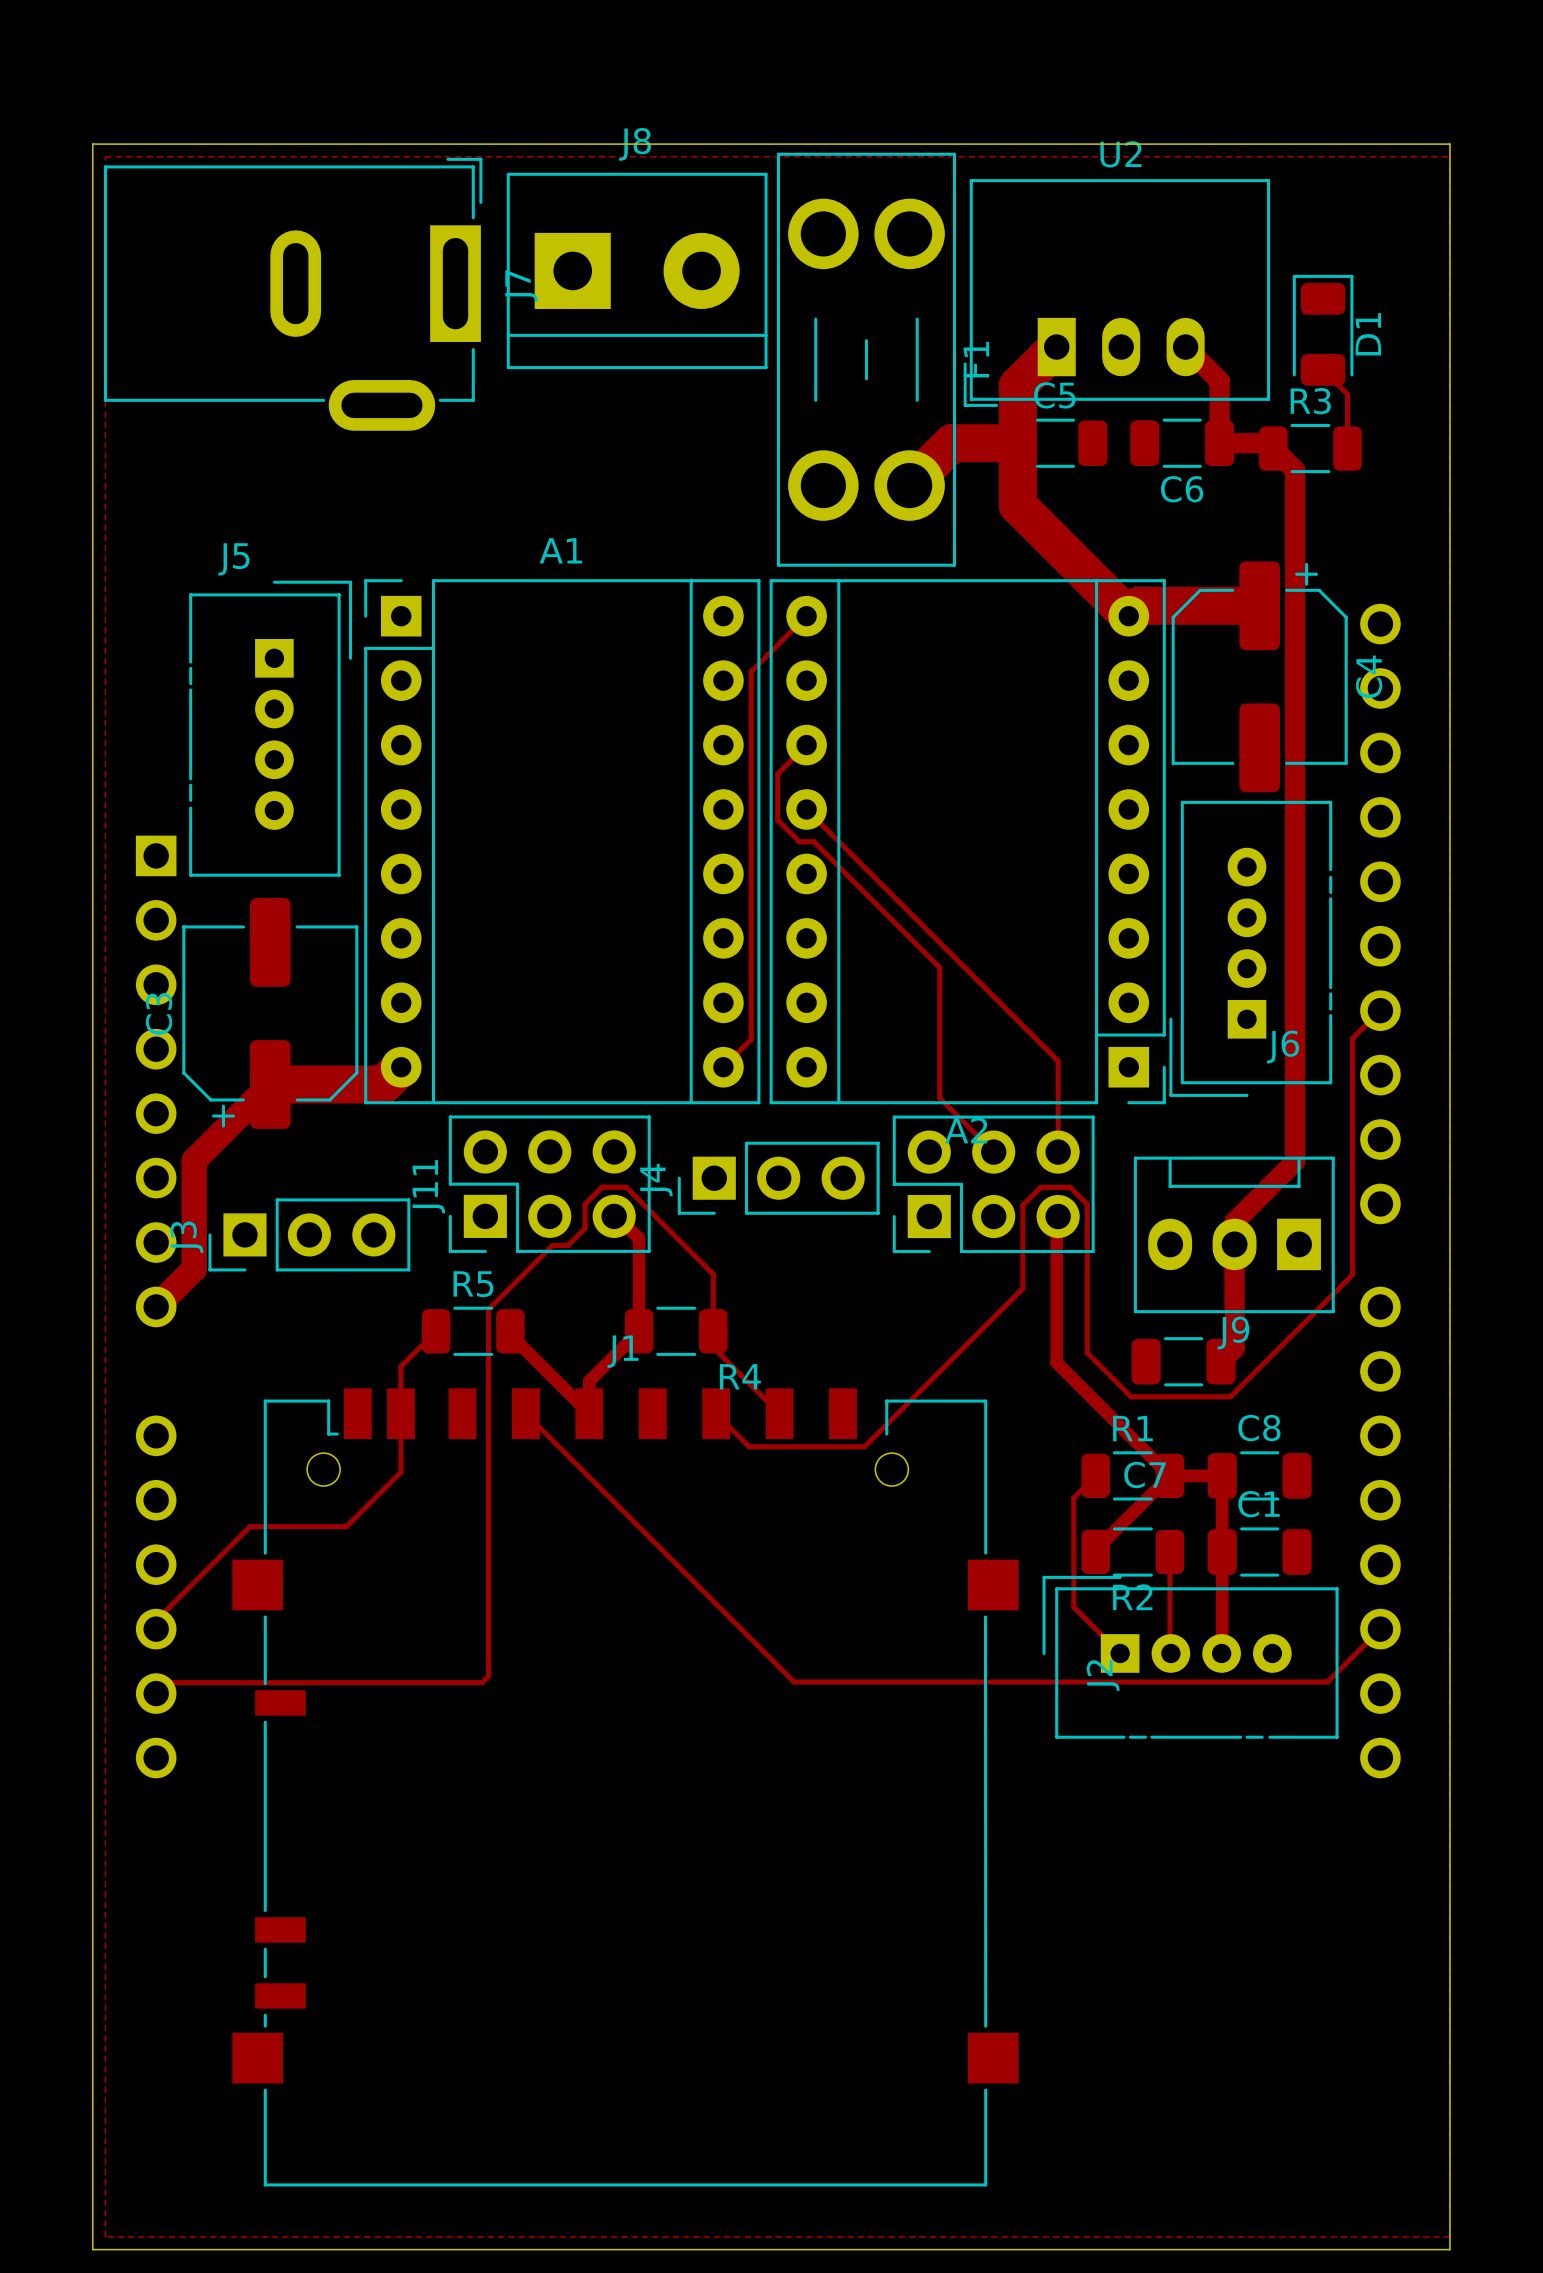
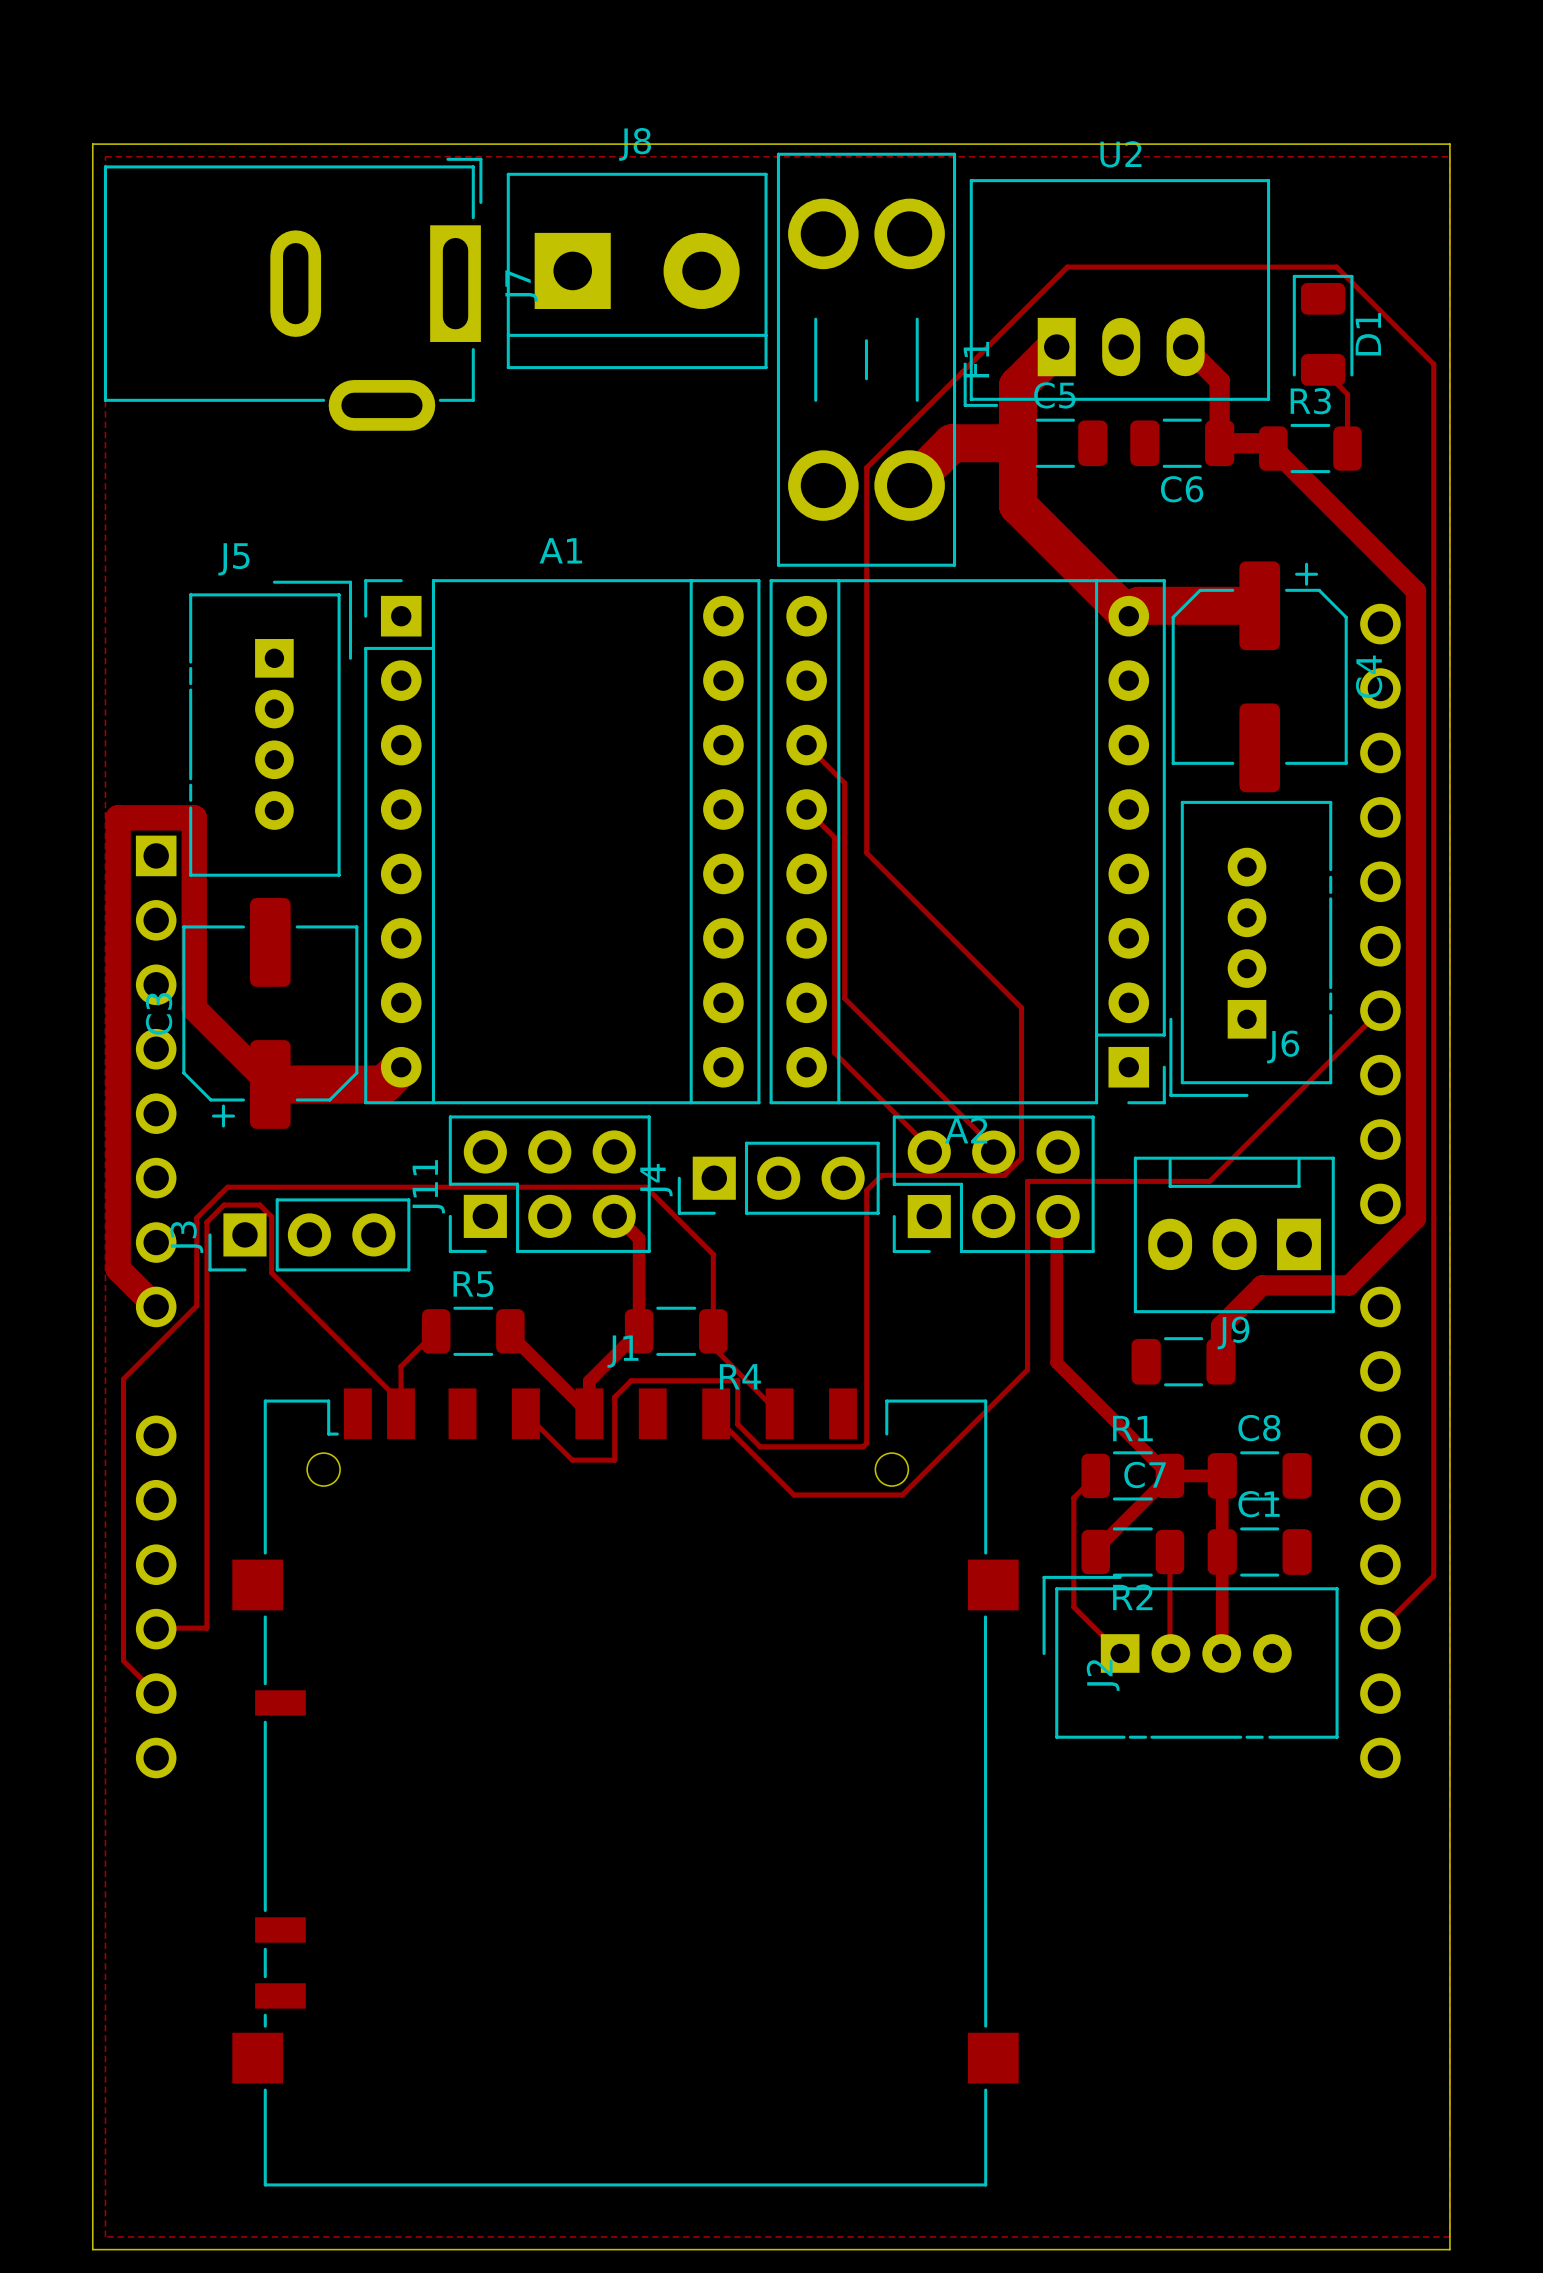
track: (1295, 470) (1295, 1161) (1234, 1221) (1234, 1244) -> (1295, 470) (1415, 591) (1415, 1218) (1349, 1285) (1261, 1285) (1221, 1326) (1221, 1361)
track: (806, 616) (751, 671) (751, 1039) (723, 1067) -> none
track: (806, 745) (777, 773) (777, 820) (799, 841) (813, 841) (939, 967) (939, 1098) (993, 1152) -> (806, 745) (844, 783) (844, 998) (992, 1146)
track: (834, 837) (1058, 1061) (1058, 1152) -> (834, 837) (834, 1052) (927, 1146)
track: (1352, 1038) (1352, 1274) (1230, 1396) (1131, 1396) (1087, 1353) (1087, 1204) (1070, 1187) (1040, 1187) (1022, 1205) (1022, 1288) (863, 1446) -> (1352, 1038) (1209, 1181) (1027, 1181) (1027, 1369) (902, 1494) (793, 1494) (716, 1417) (716, 1413)
track: (270, 1084) (194, 1160) (194, 1268) (156, 1306) -> (270, 1084) (194, 1008) (194, 817) (118, 817) (118, 1268) (156, 1306)
track: (602, 1187) (585, 1204) (585, 1228) (567, 1245) (552, 1245) (488, 1309) (488, 1676) (482, 1682) (167, 1682) (156, 1693) -> (602, 1187) (227, 1187) (196, 1218) (196, 1305) (123, 1379) (123, 1660) (156, 1693)
track: (626, 1187) (713, 1274) -> (626, 1187) (646, 1187) (713, 1254) (713, 1274)
track: (1234, 1258) (1234, 1348) (1221, 1361) -> none
track: (400, 1413) (400, 1472) (346, 1526) (250, 1526) (156, 1620) (156, 1629) -> (400, 1402) (271, 1272) (271, 1216) (259, 1205) (224, 1205) (206, 1222) (206, 1628) (156, 1629)
track: (716, 1413) (749, 1446) (760, 1446) -> (572, 1460) (614, 1460) (614, 1397) (631, 1380) (737, 1380) (737, 1424) (760, 1446)
track: (572, 1460) (794, 1682) (1327, 1682) (1380, 1629) -> (863, 1446) (866, 1443) (866, 1190) (881, 1175) (1004, 1175) (1021, 1158) (1021, 1007) (866, 852) (866, 467) (1067, 267) (1336, 267) (1433, 364) (1433, 1575) (1380, 1629)

